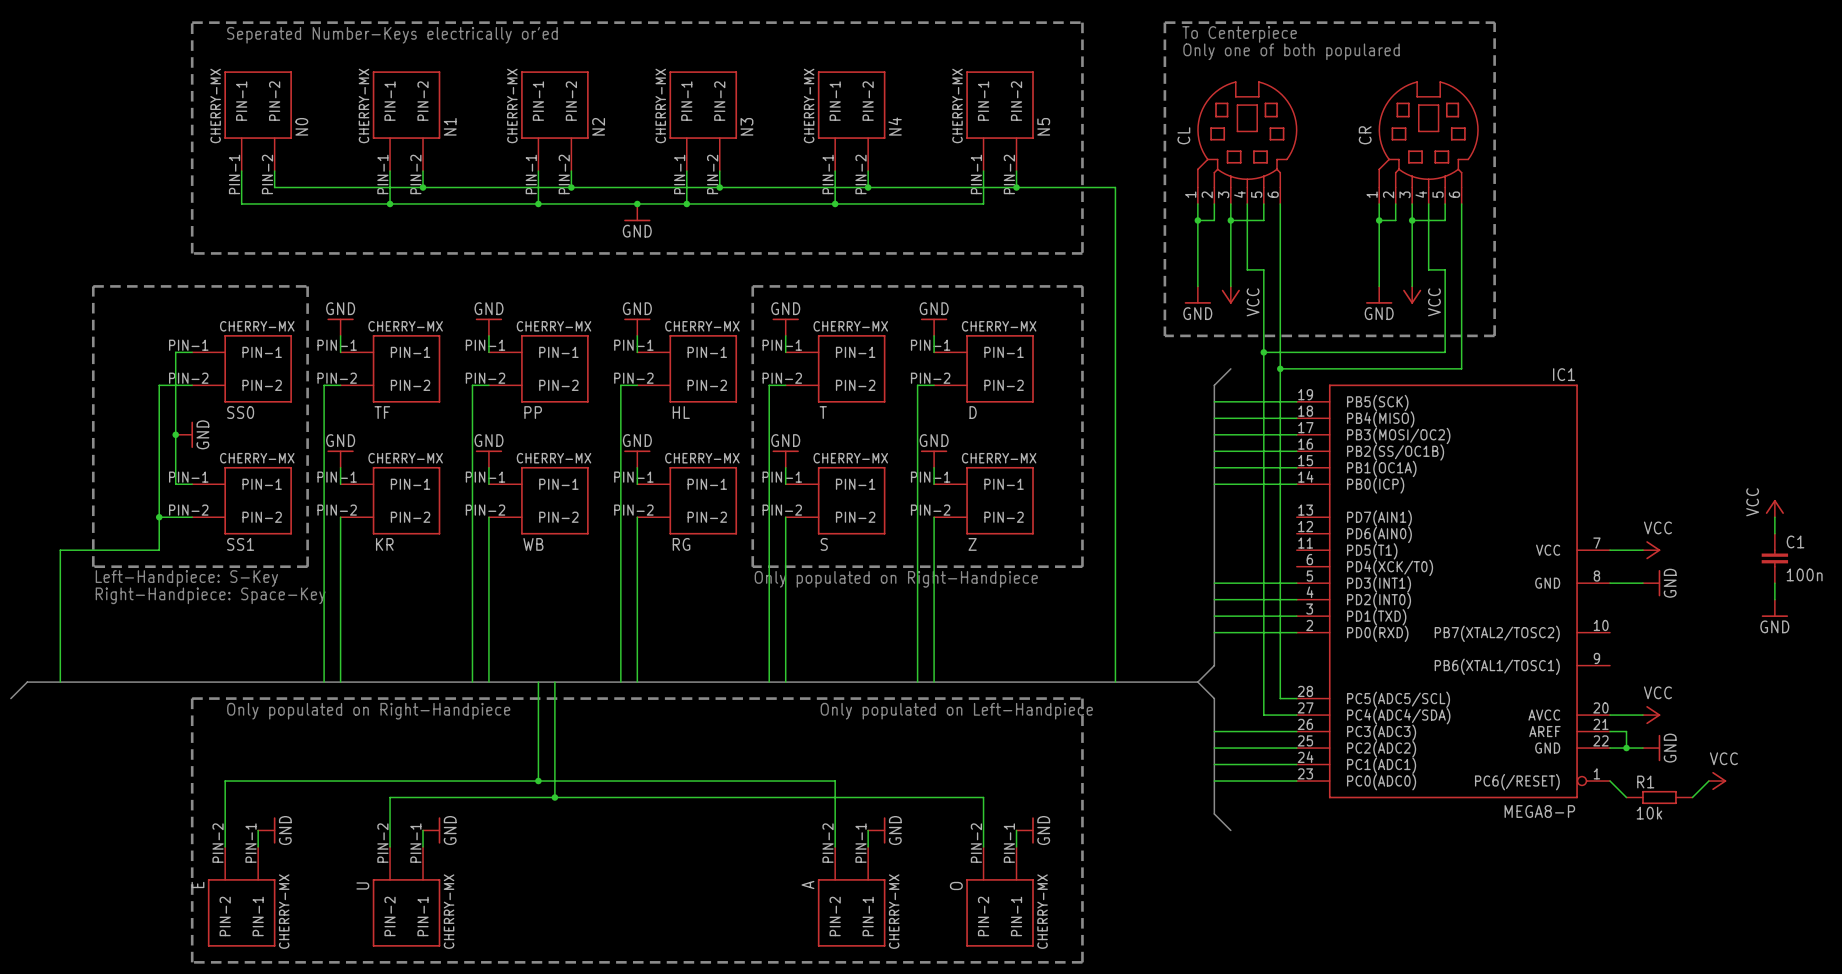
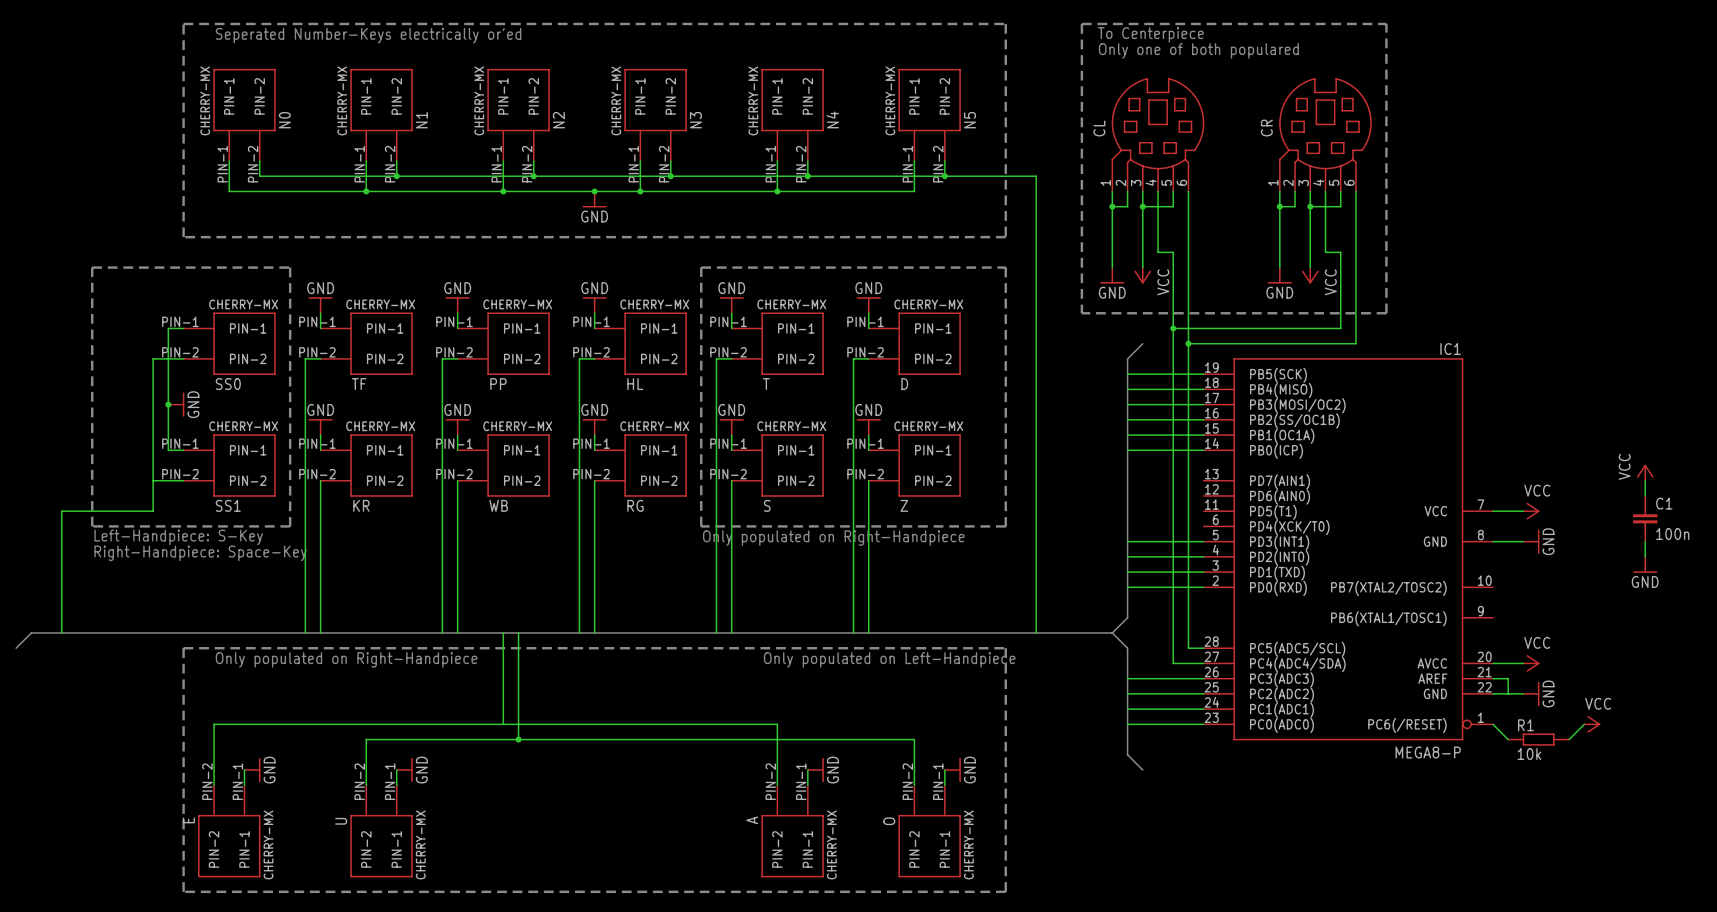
junction: (159, 517) -> none
junction: (1626, 748) -> none
junction: (538, 781) -> none

